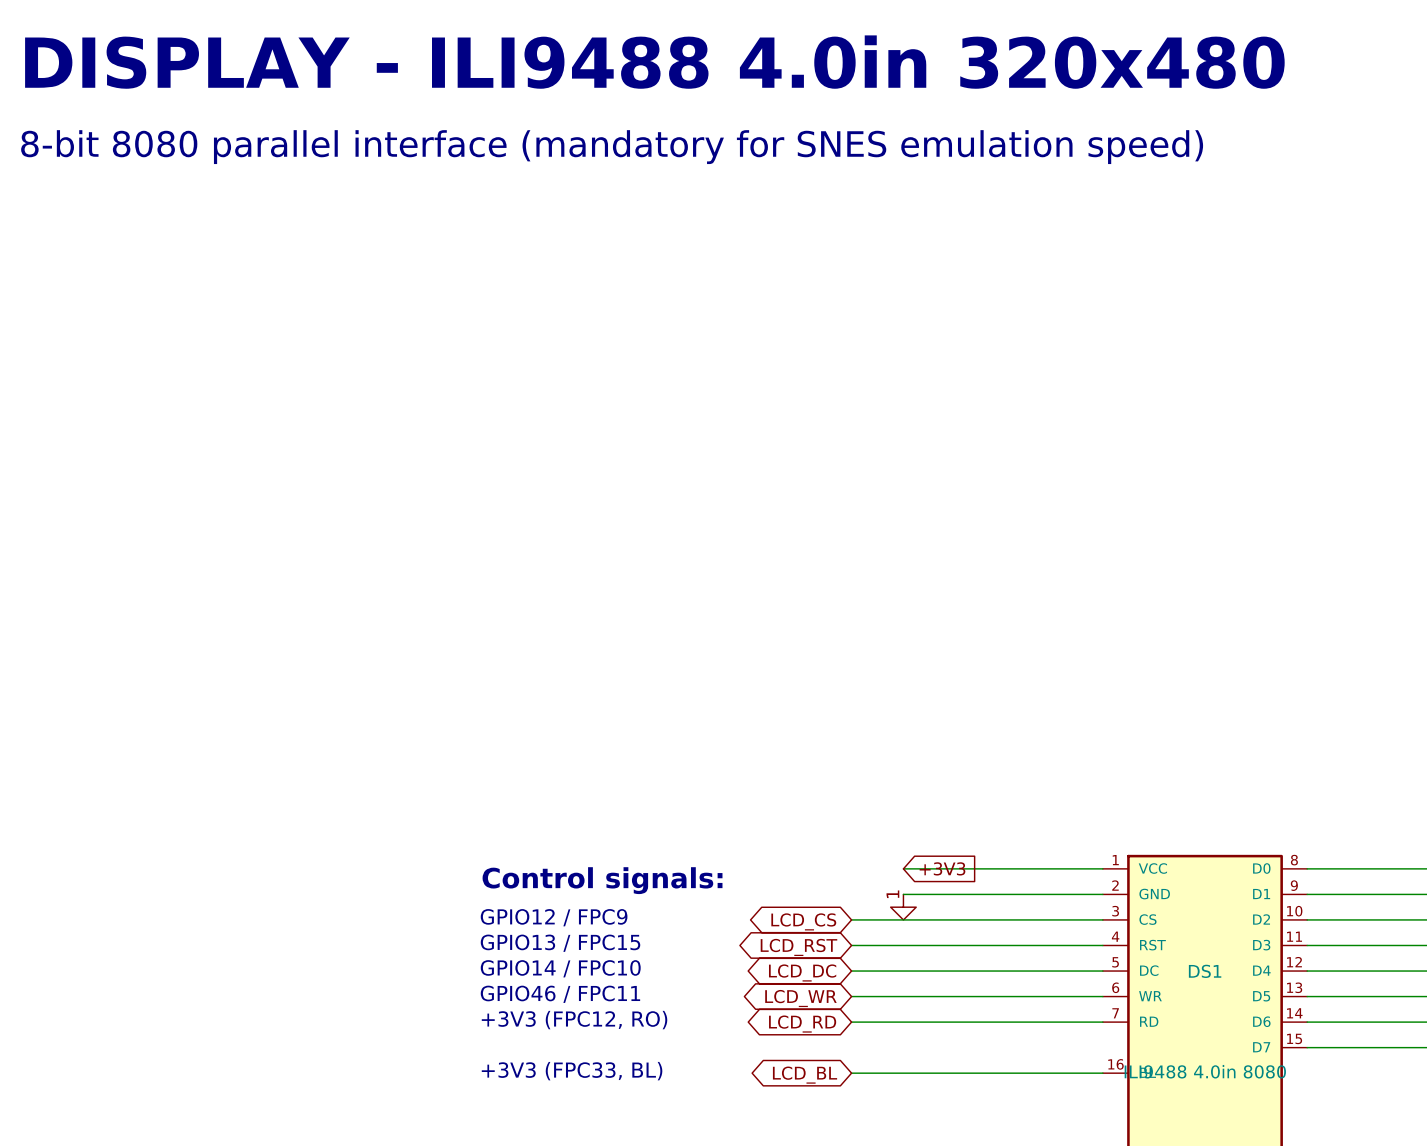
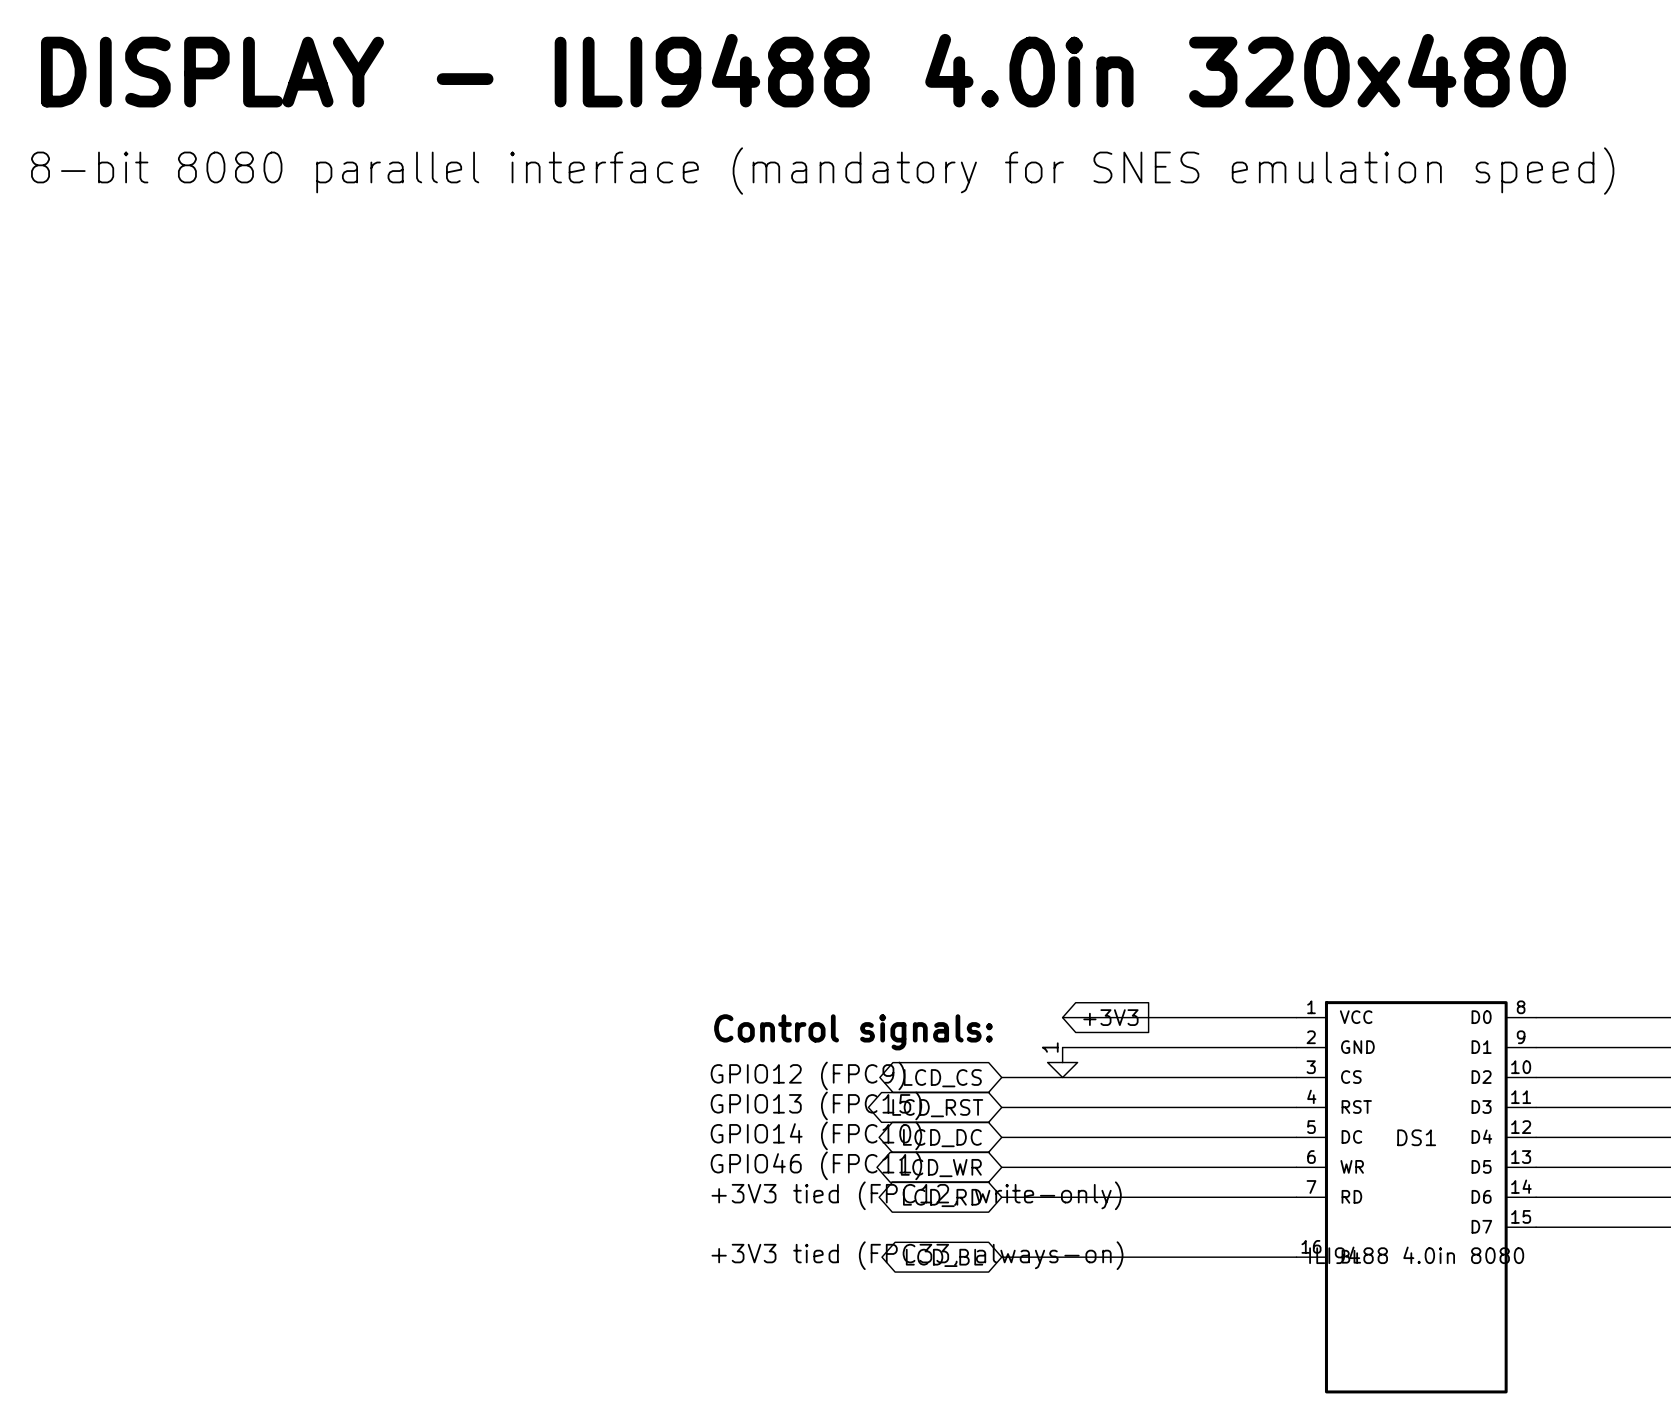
text position: Control signals: (602, 880) -> Control signals: (853, 1032)
text: GPIO12 / FPC9 (554, 917) -> none
text: none -> GPIO12 (FPC9) (807, 1075)
text: GPIO13 / FPC15 (560, 943) -> none
text: none -> GPIO13 (FPC15) (816, 1105)
text: GPIO14 / FPC10 (560, 968) -> none
text: none -> GPIO14 (FPC10) (816, 1135)
text: GPIO46 / FPC11 (560, 994) -> none
text: none -> GPIO46 (FPC11) (816, 1165)
text: +3V3 (FPC12, RO) (574, 1020) -> +3V3 tied (FPC12, write-only) (916, 1195)
text: +3V3 (FPC33, BL) (572, 1071) -> +3V3 tied (FPC33, always-on) (917, 1255)

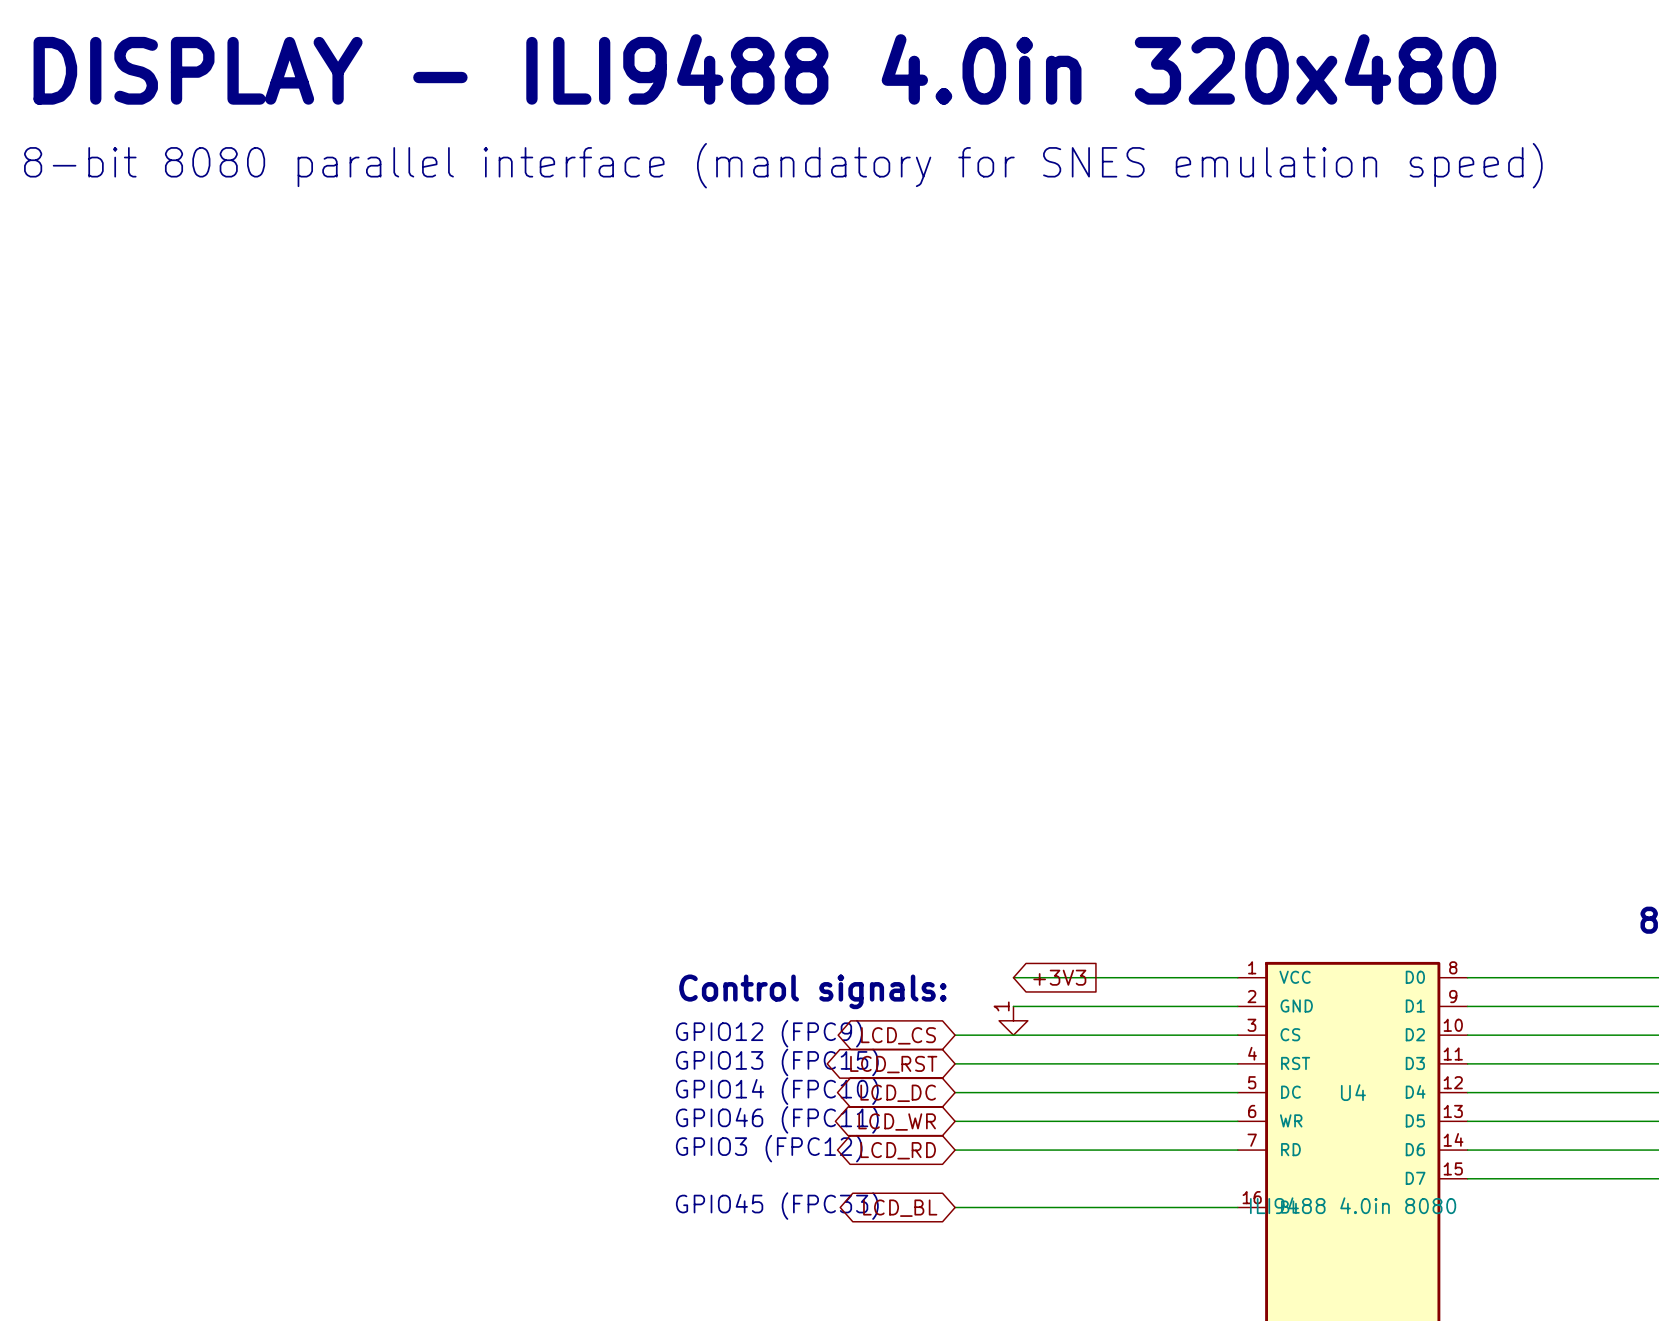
DS1 name: DS1 (1416, 1137) -> U4 (1353, 1092)
text: +3V3 tied (FPC12, write-only) (916, 1195) -> GPIO3 (FPC12) (769, 1148)
text: +3V3 tied (FPC33, always-on) (917, 1255) -> GPIO45 (FPC33) (777, 1206)

